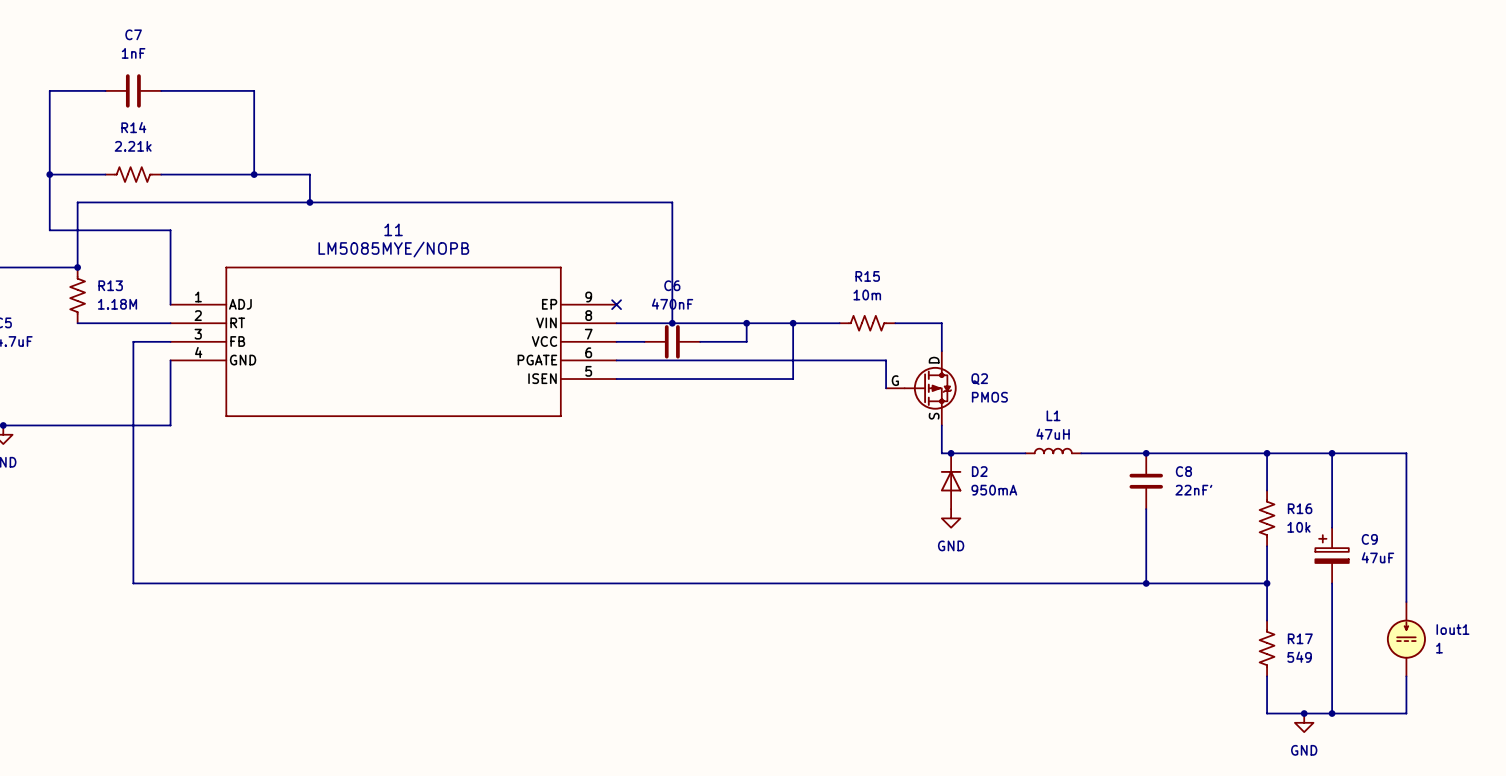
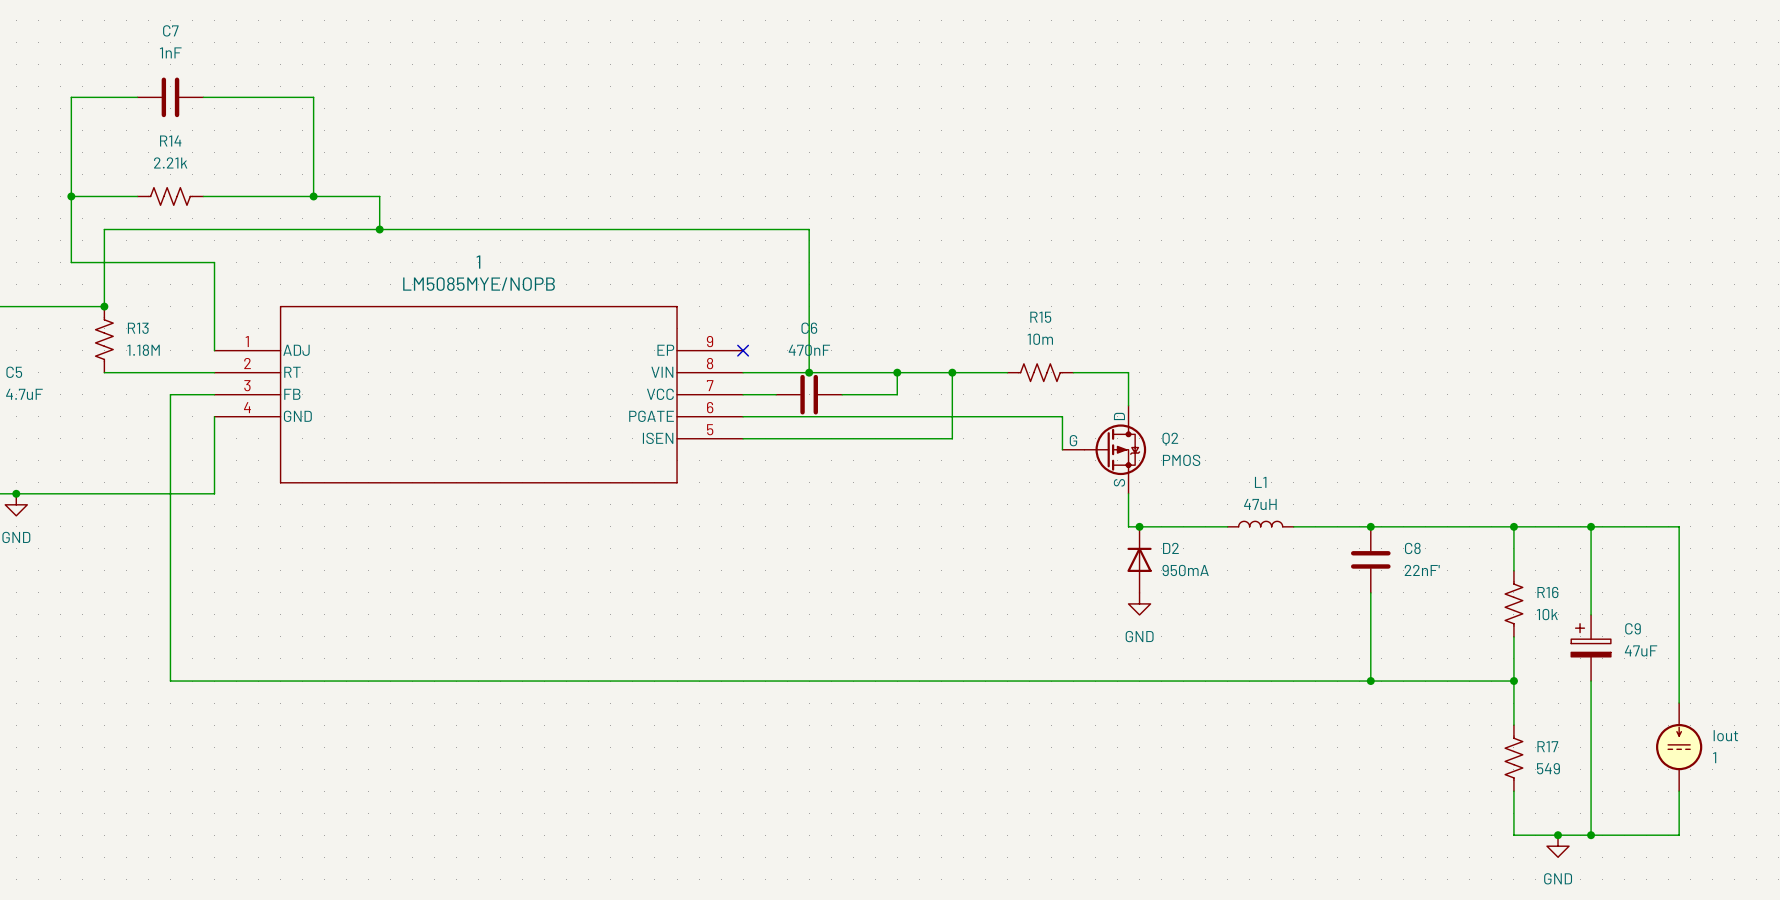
11 name: 11 (393, 229) -> 1 (478, 262)
Iout1 name: Iout1 (1452, 629) -> Iout (1725, 735)

